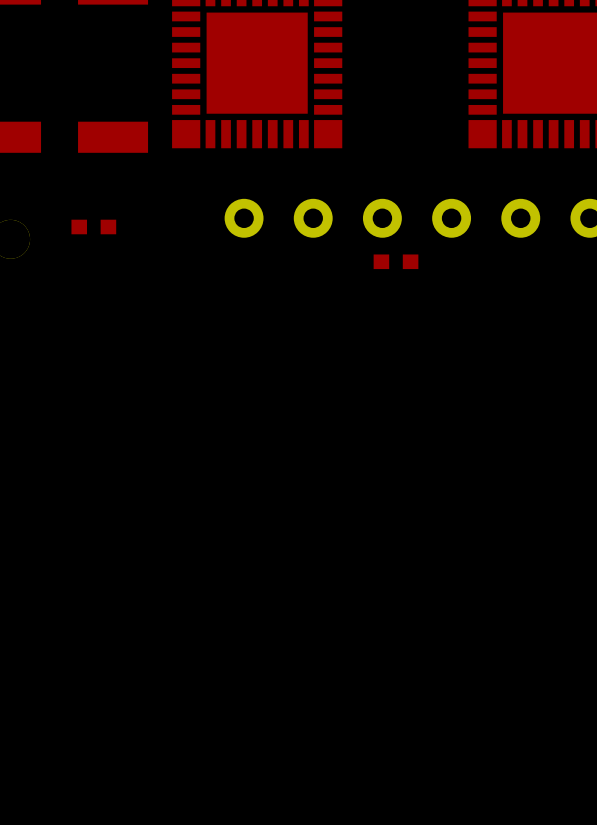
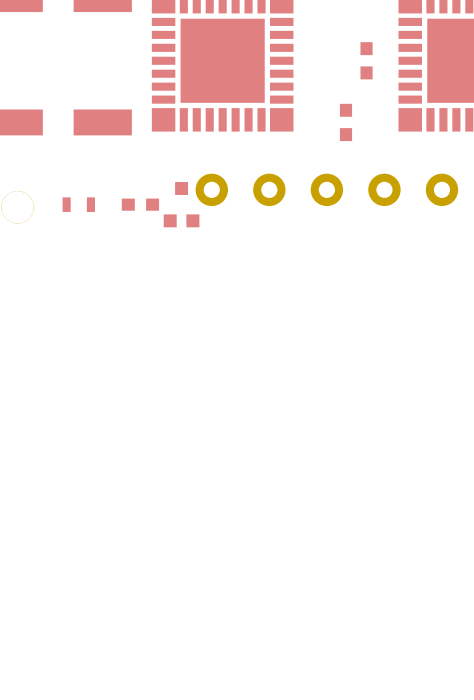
part: none -> (366, 60)
part: none -> (345, 122)
part footprint: [71, 219, 117, 235] -> [62, 197, 95, 212]
part: none -> (140, 204)
part: none -> (181, 204)
part: (396, 261) -> none

